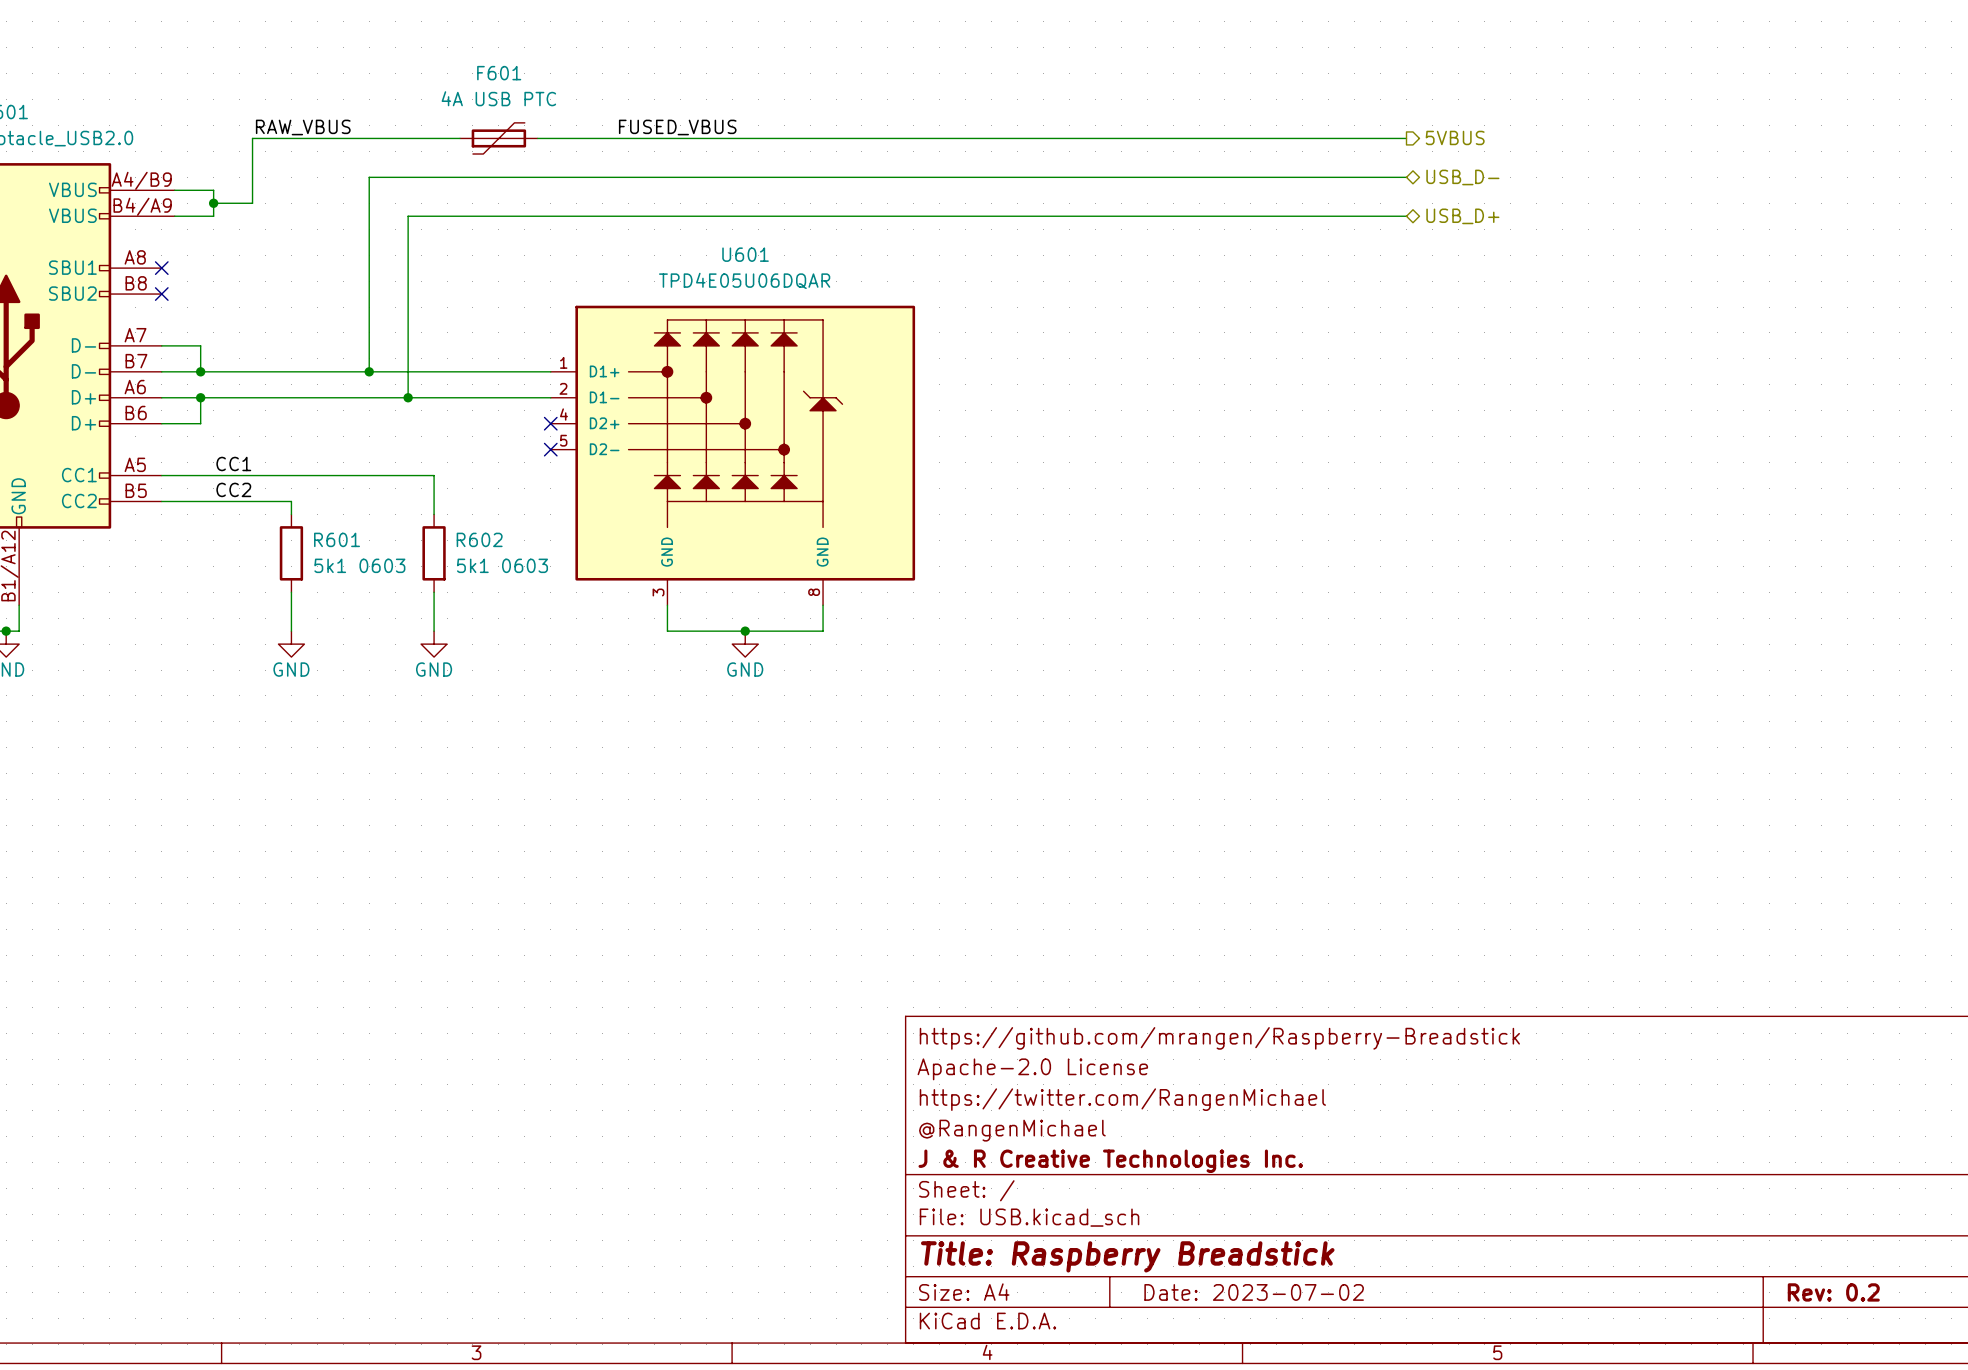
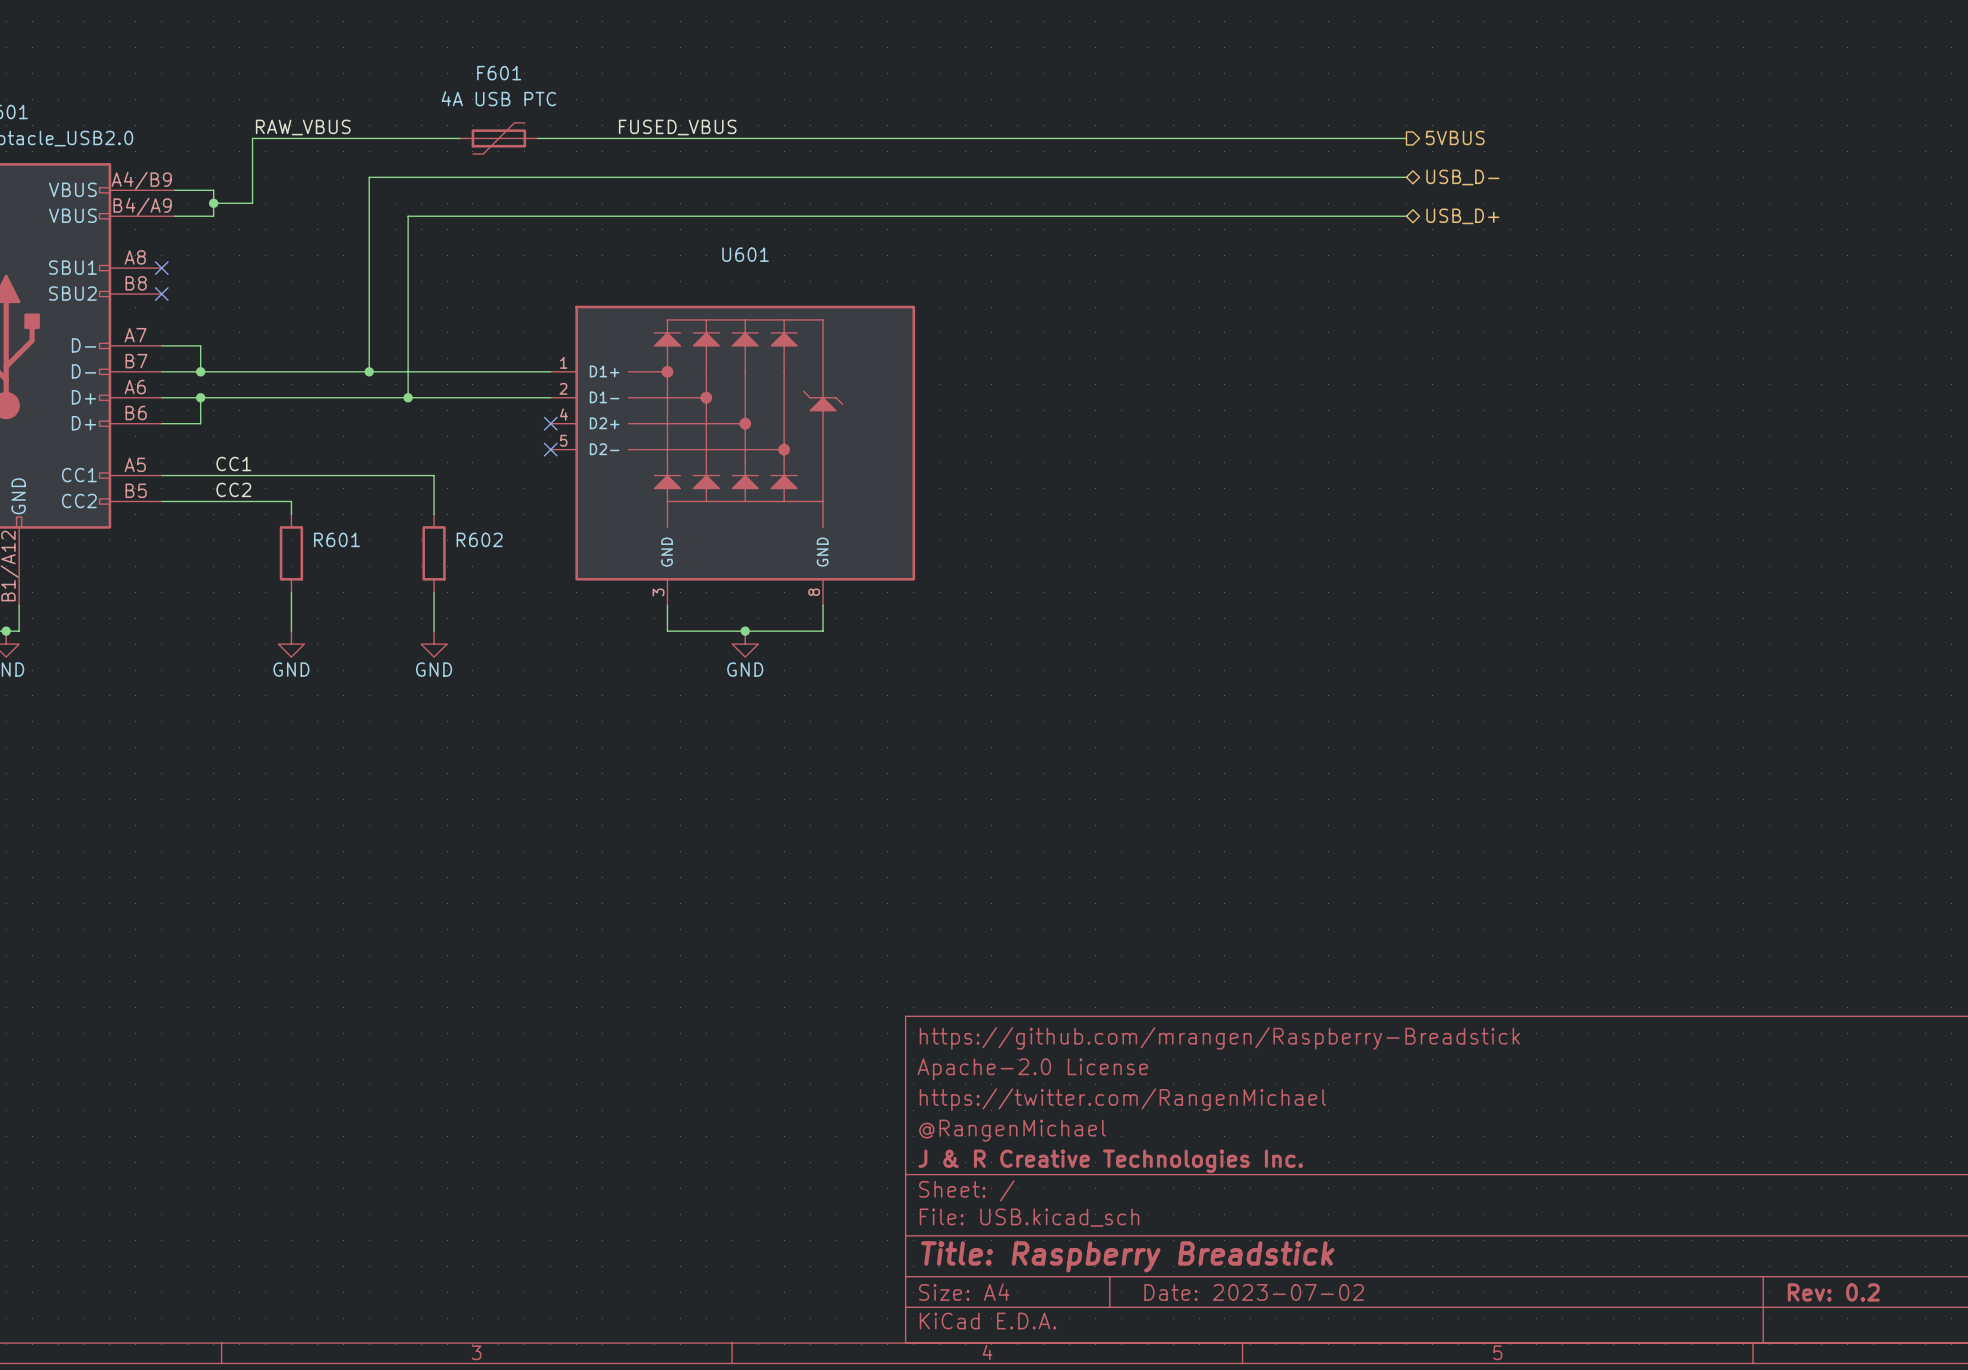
U601 value: TPD4E05U06DQAR (744, 280) -> none
R601 value: 5k1 0603 (359, 565) -> none
R602 value: 5k1 0603 (502, 565) -> none

